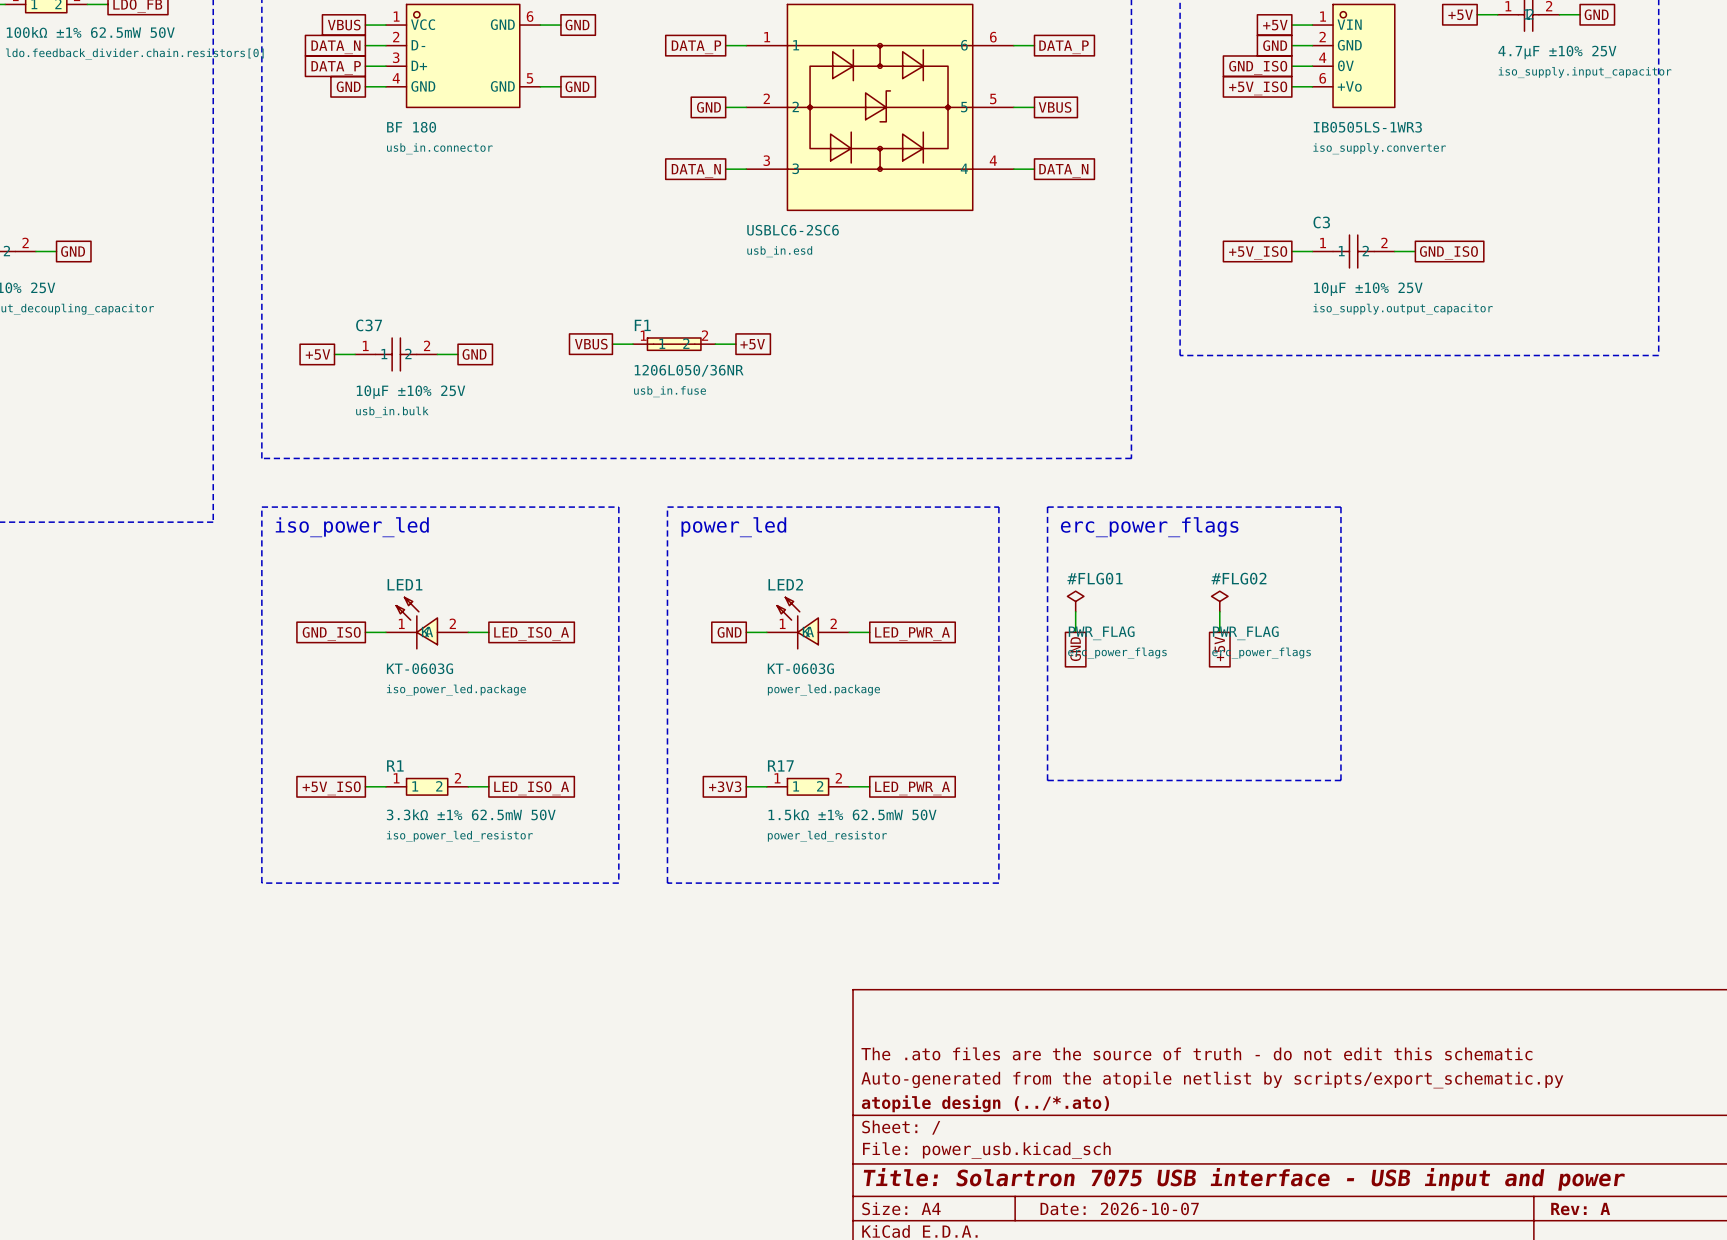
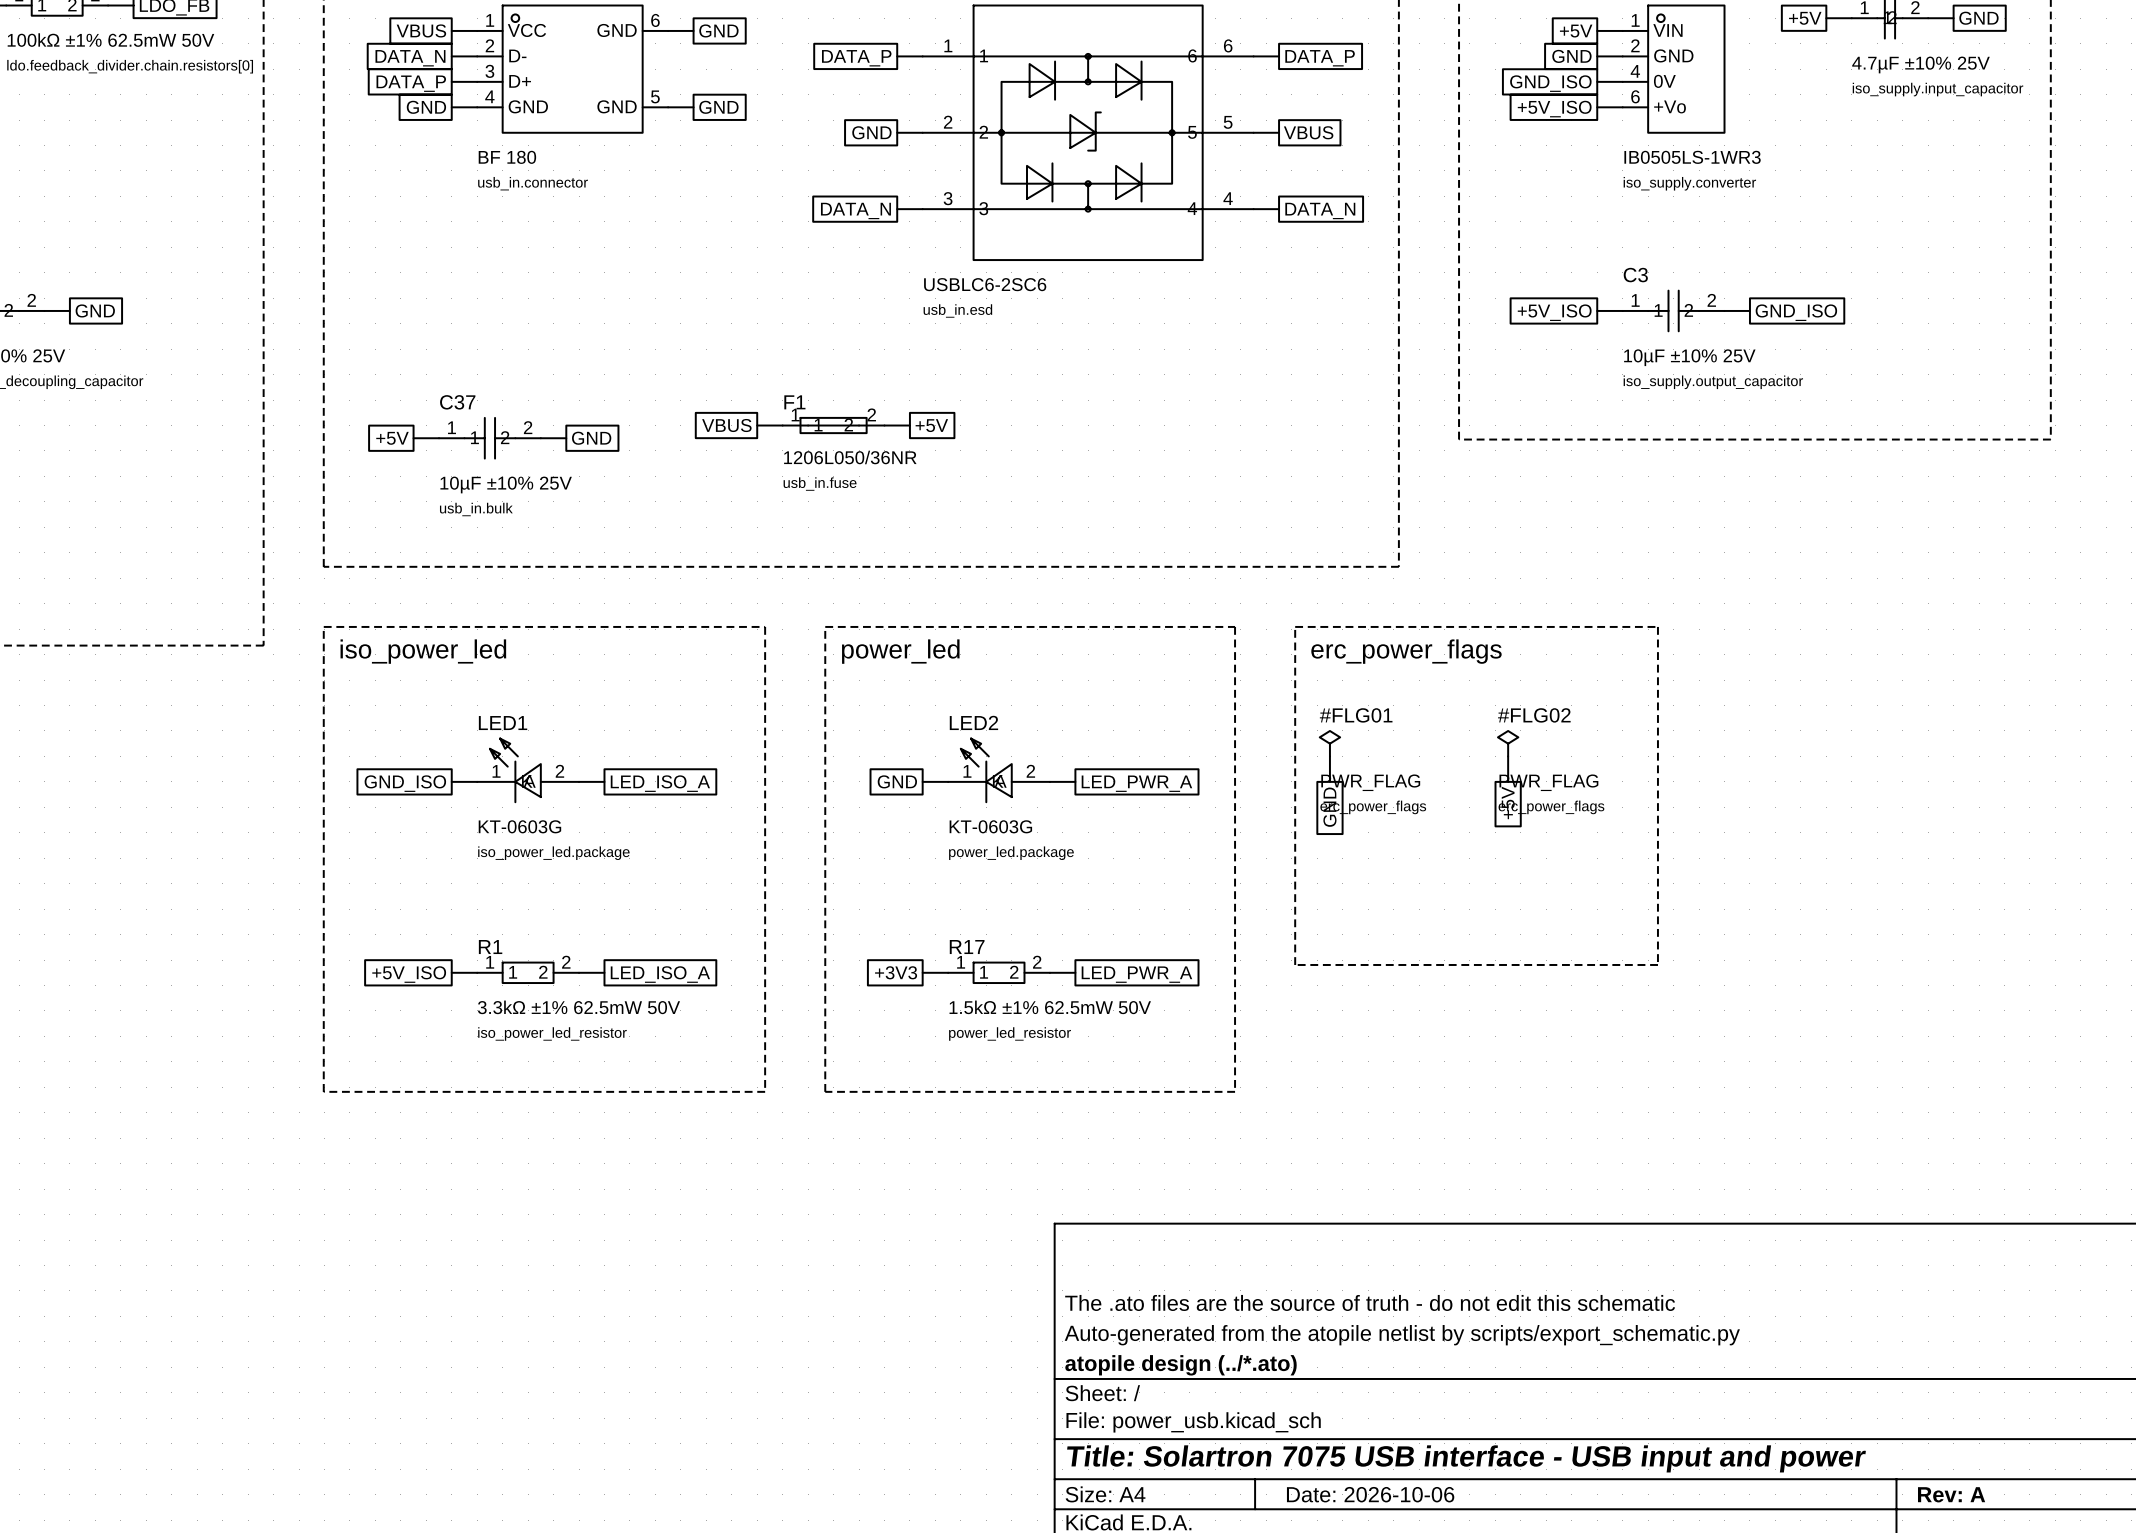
title block: Date: 2026-10-07 (1119, 1208) -> Date: 2026-10-06 (1370, 1494)

